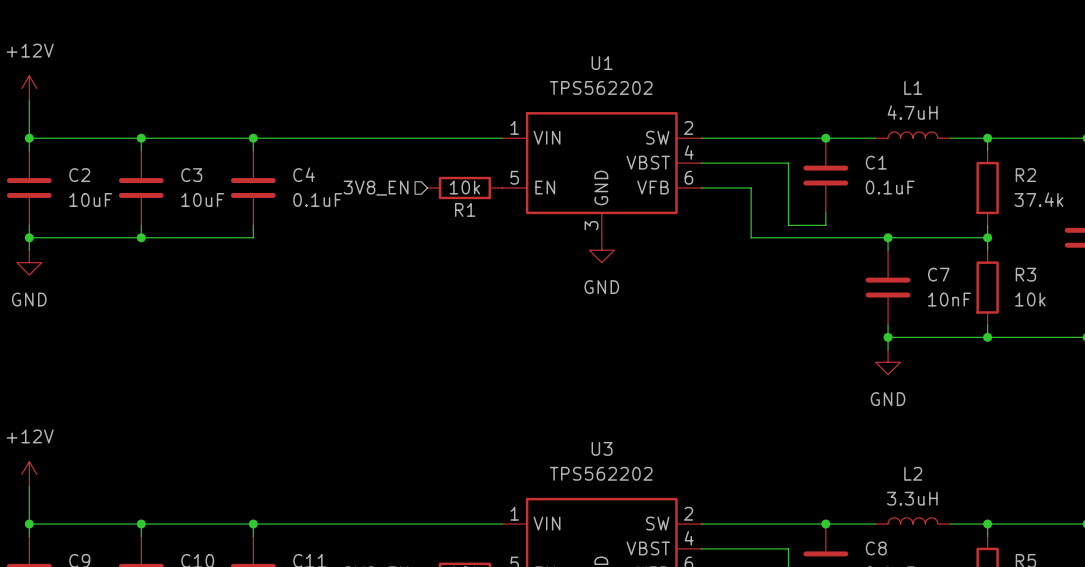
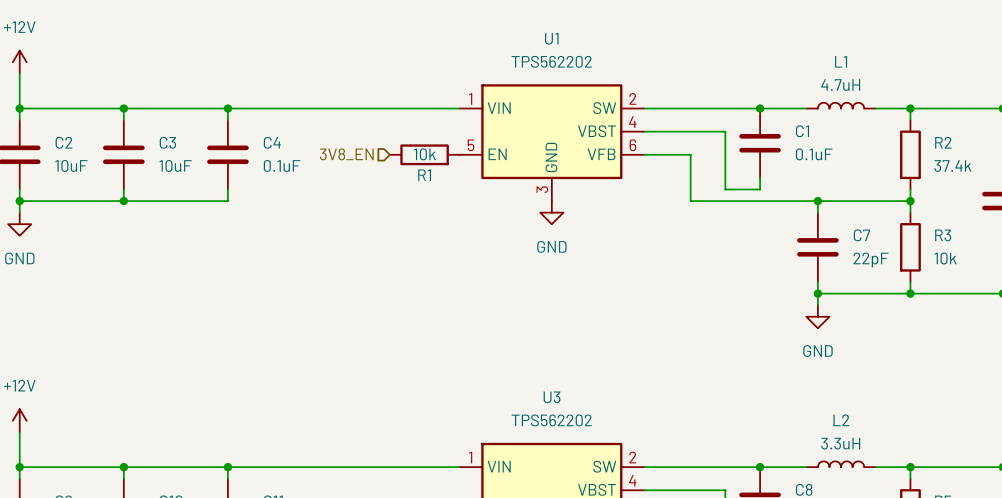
C7 value: 10nF (949, 299) -> 22pF (871, 260)

